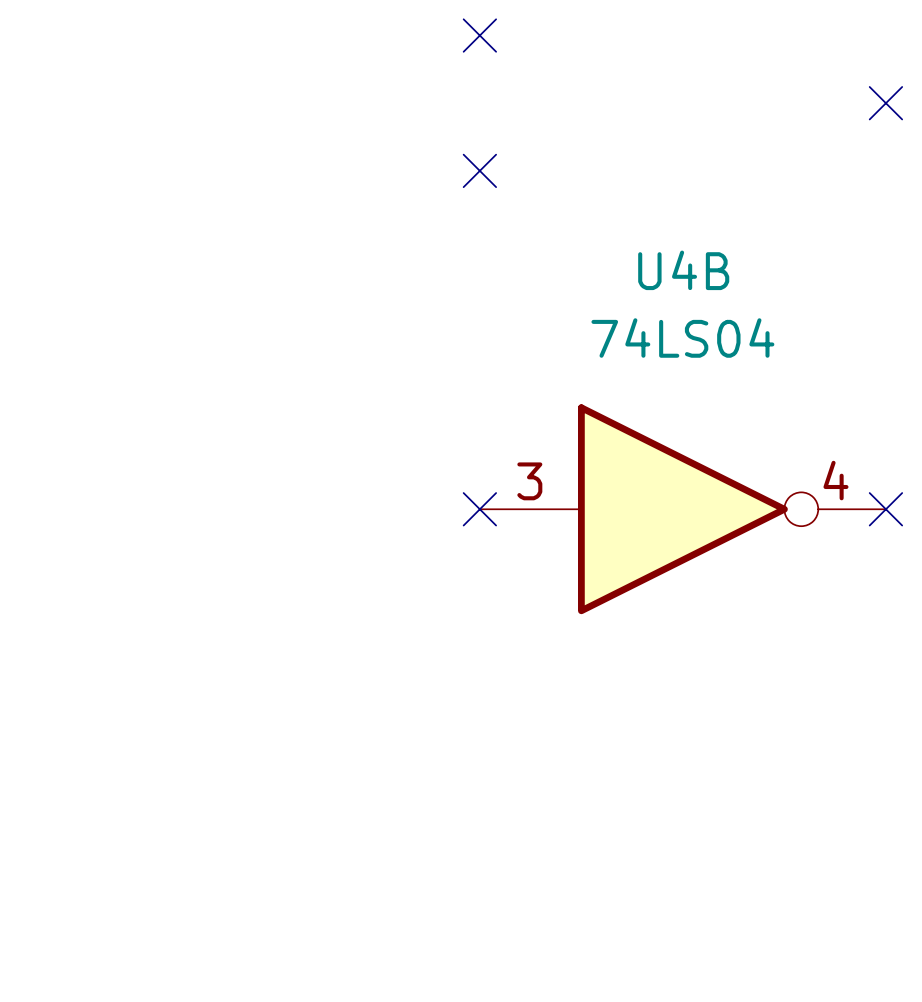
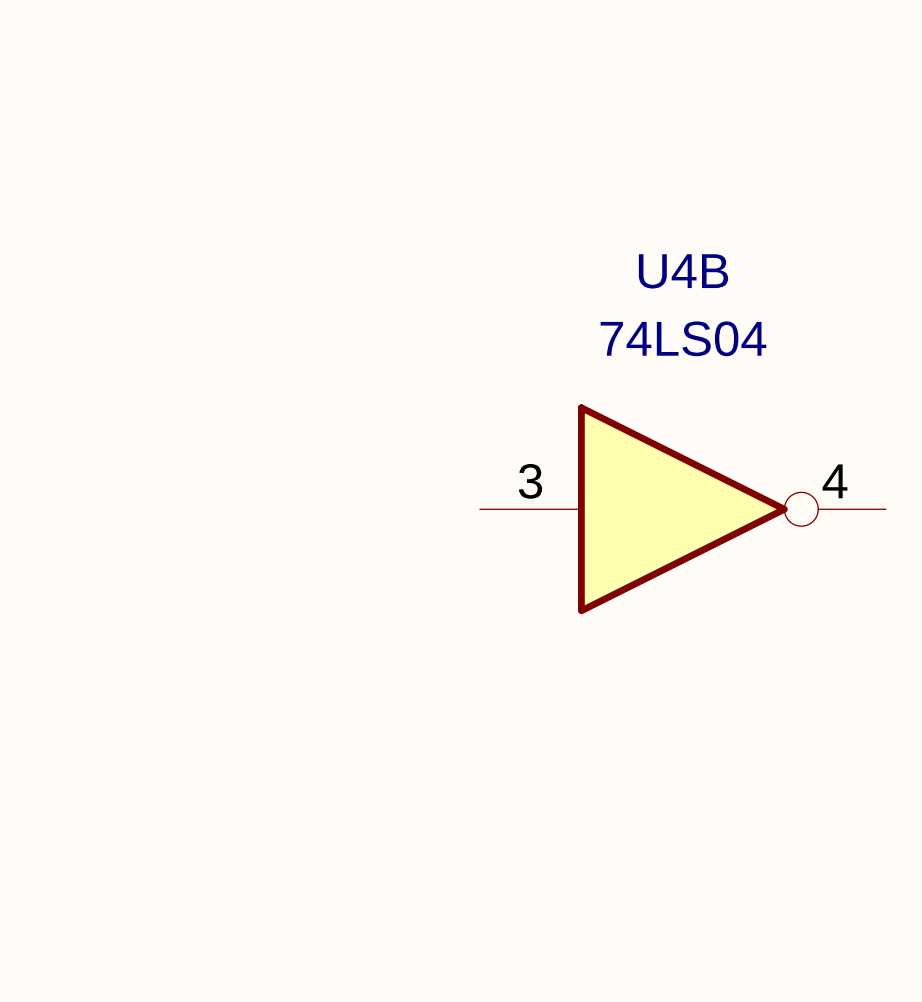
no-connect mark: (479, 35) -> none
no-connect mark: (885, 103) -> none
no-connect mark: (479, 170) -> none
no-connect mark: (479, 509) -> none
no-connect mark: (885, 509) -> none

